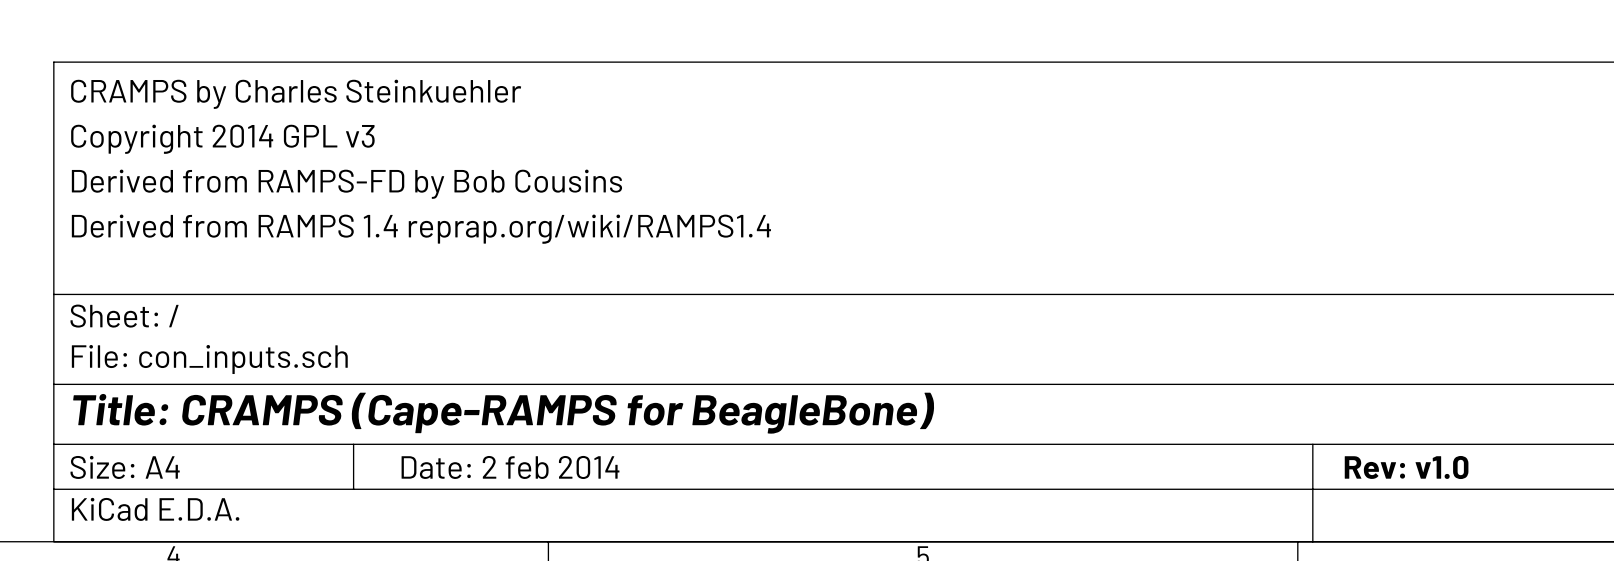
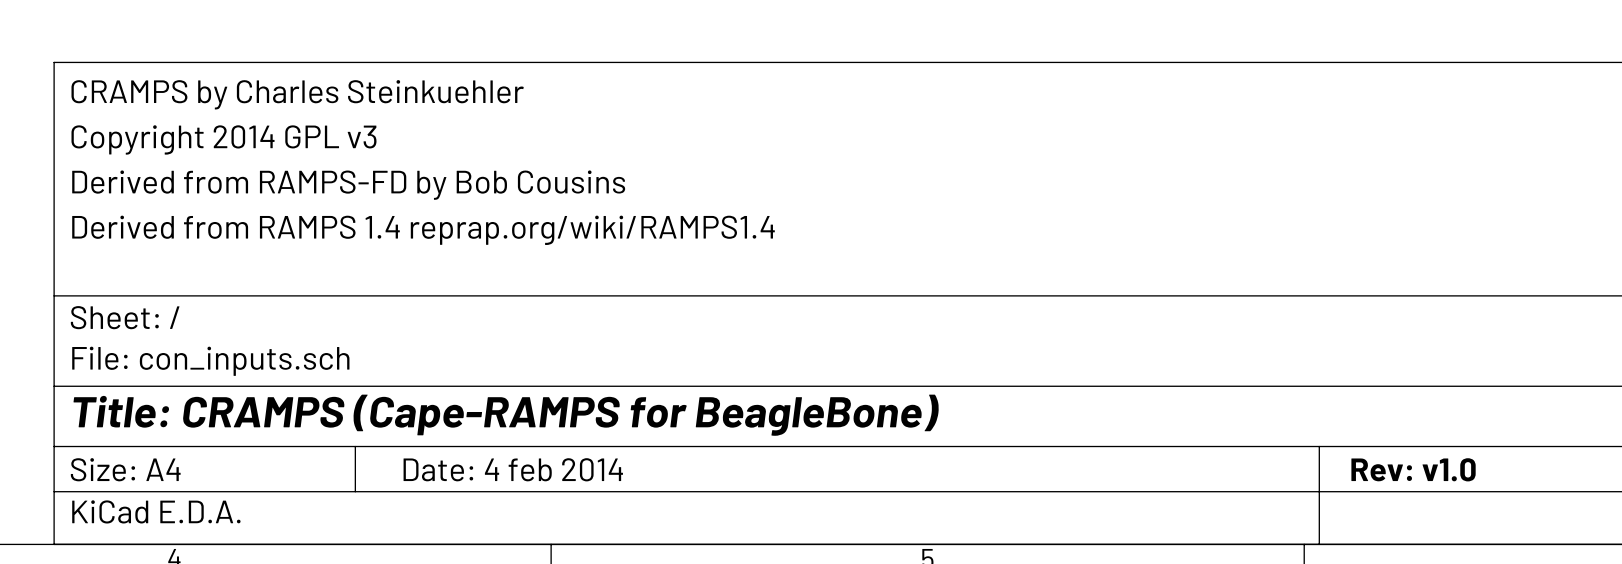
title block: Date: 2 feb 2014 (510, 467) -> Date: 4 feb 2014 (513, 469)

